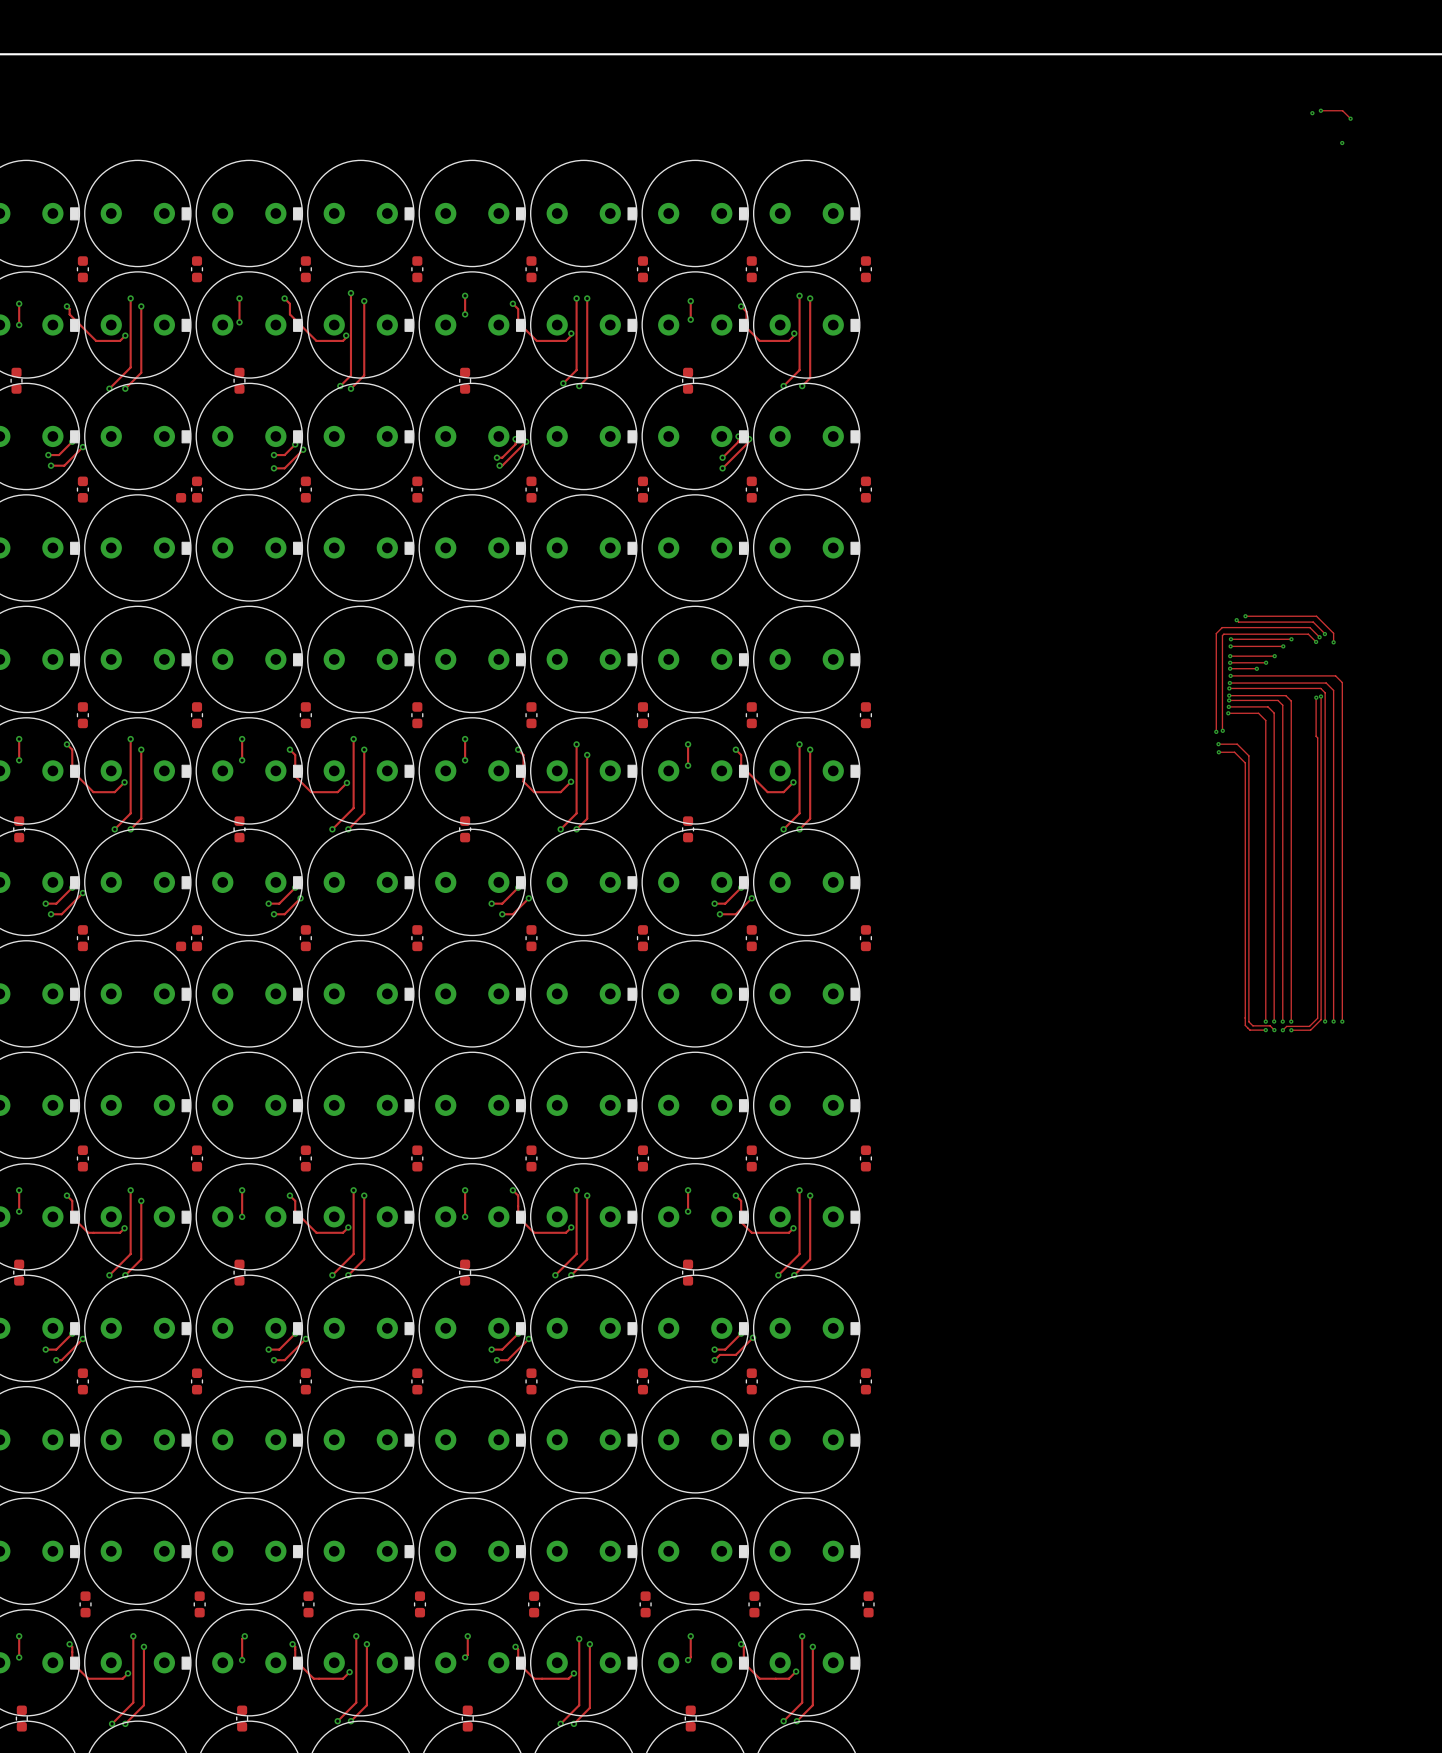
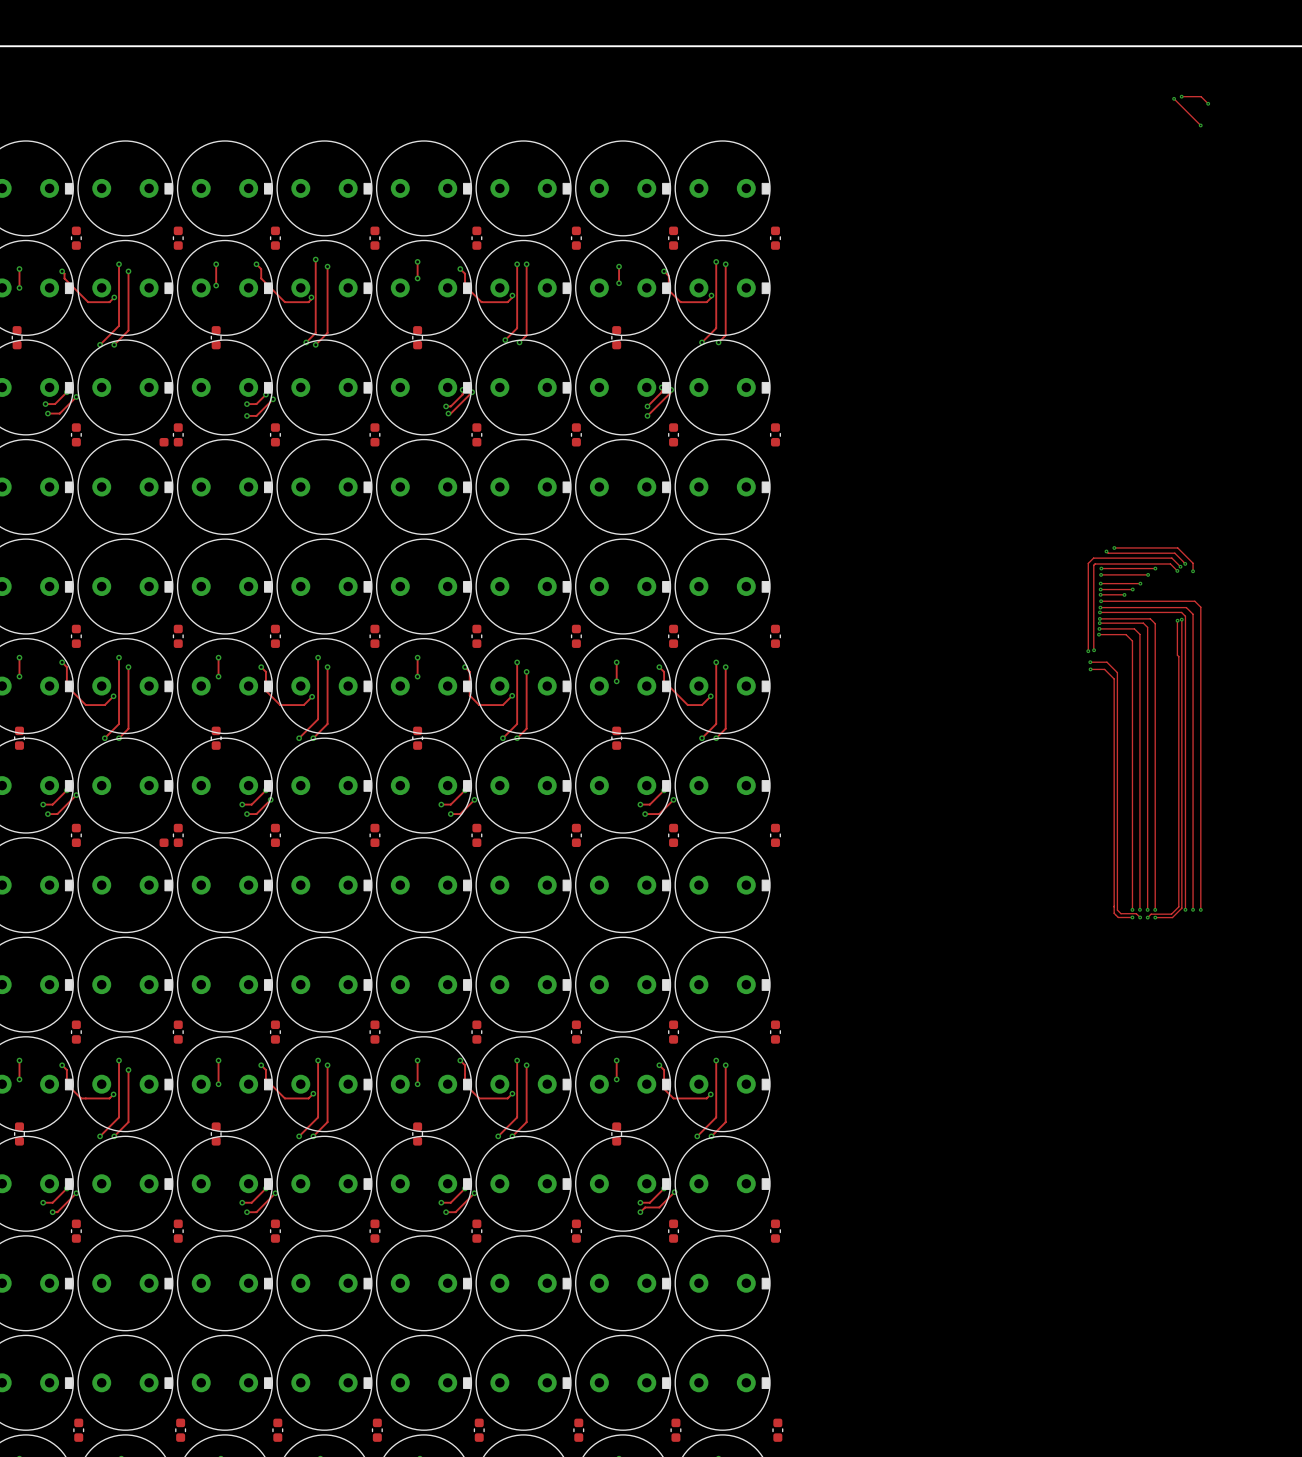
track: none -> (1174, 98) (1200, 125)

